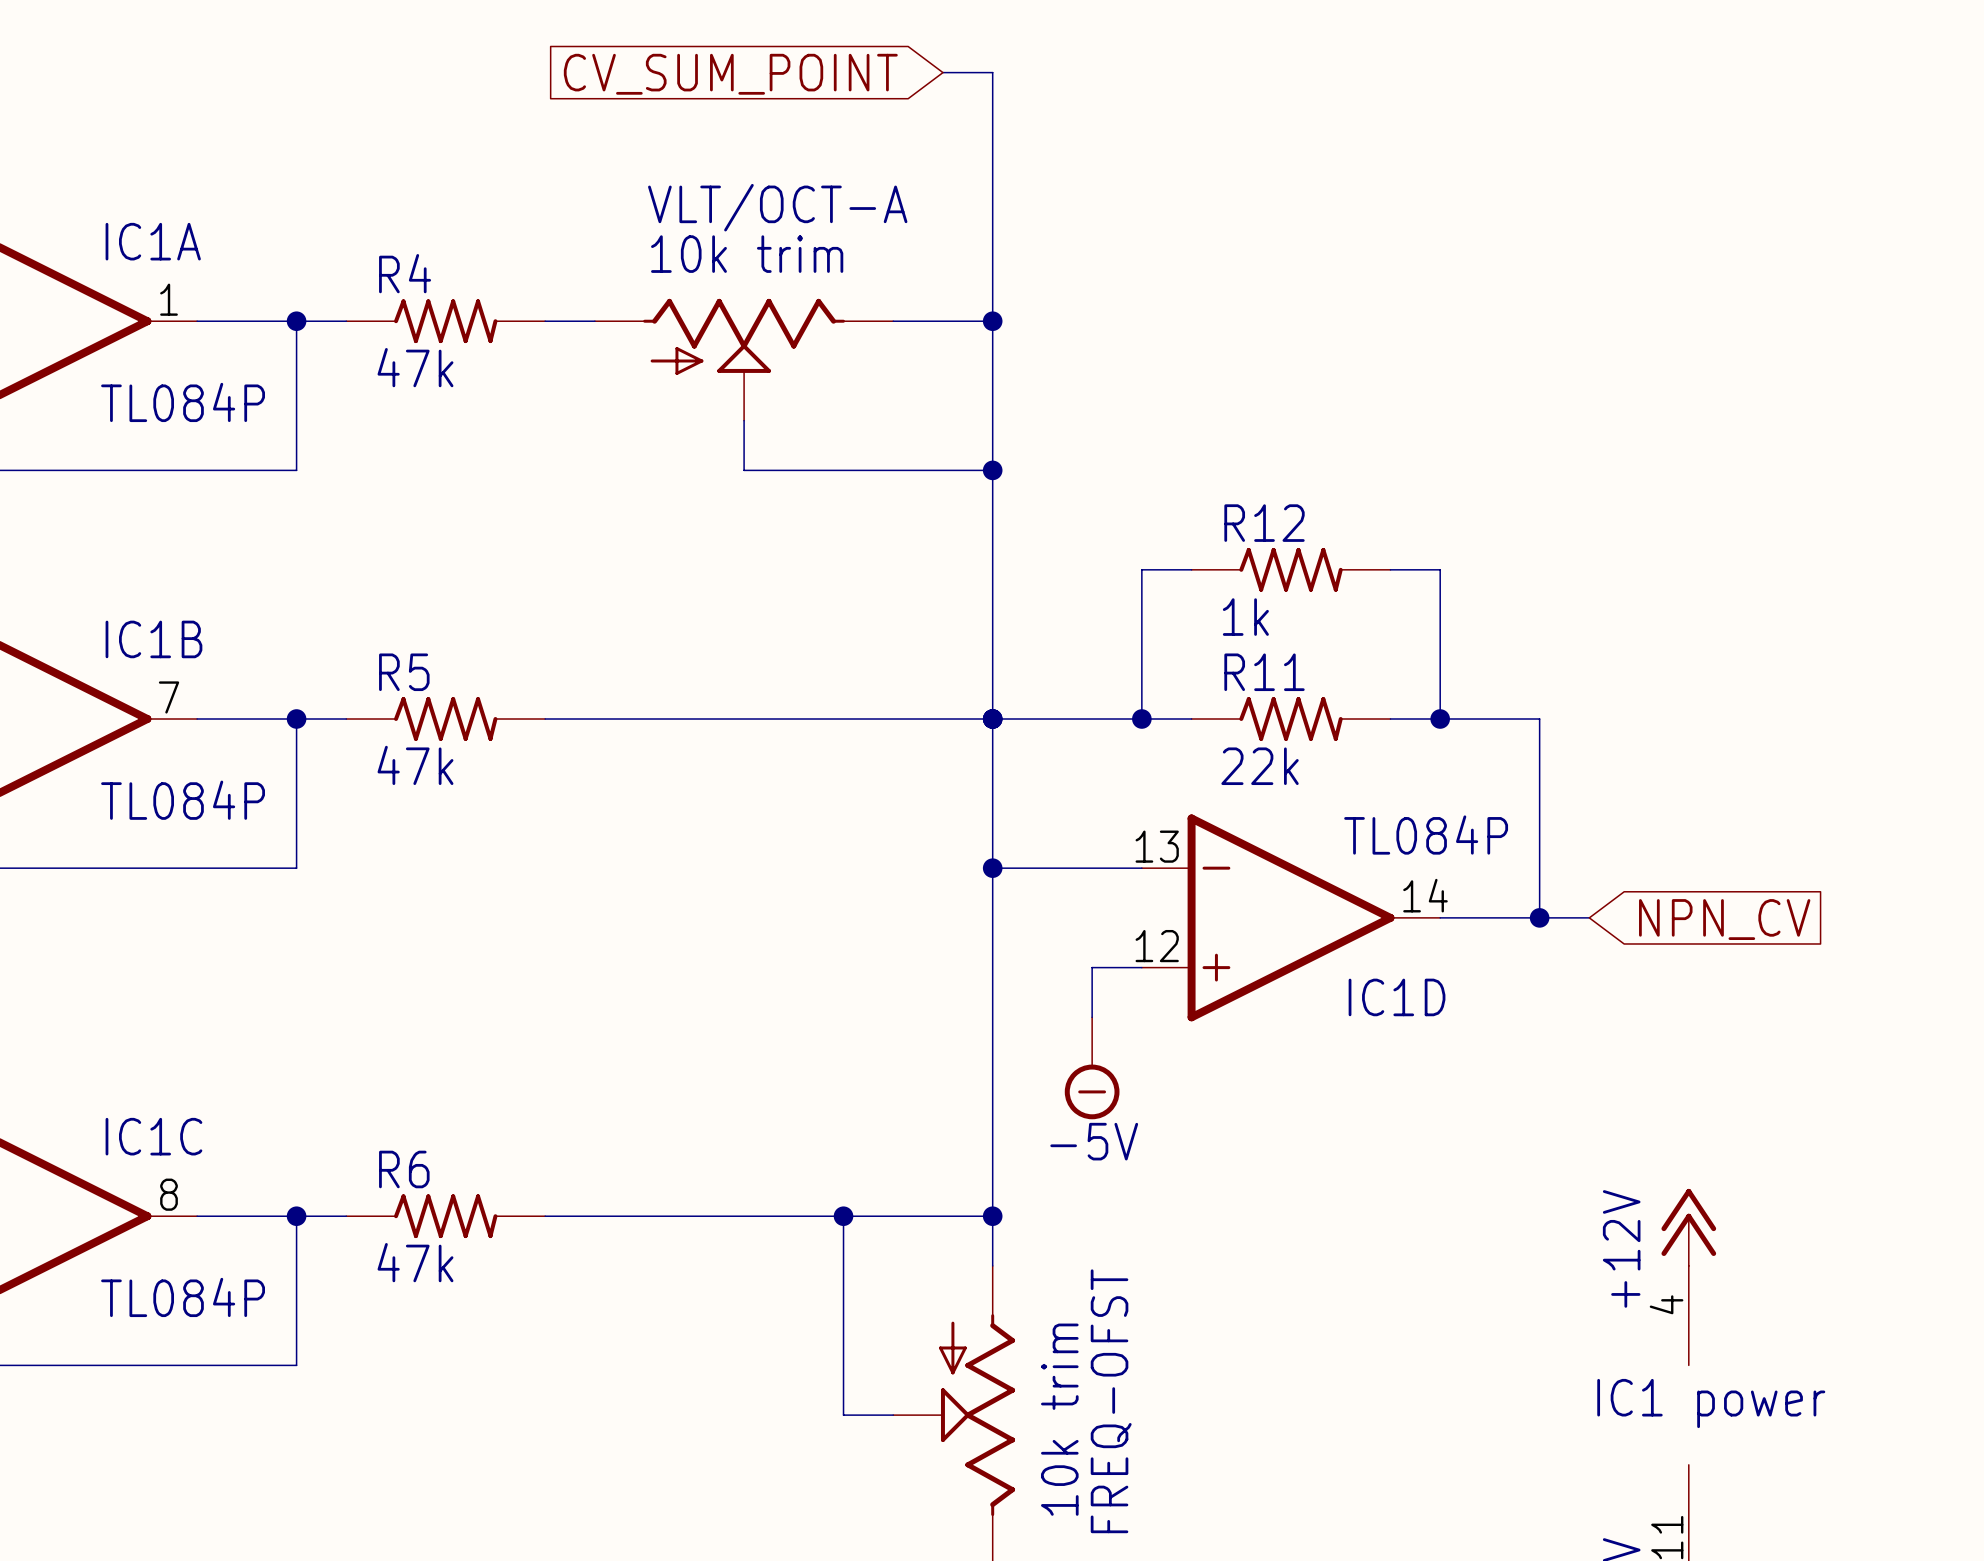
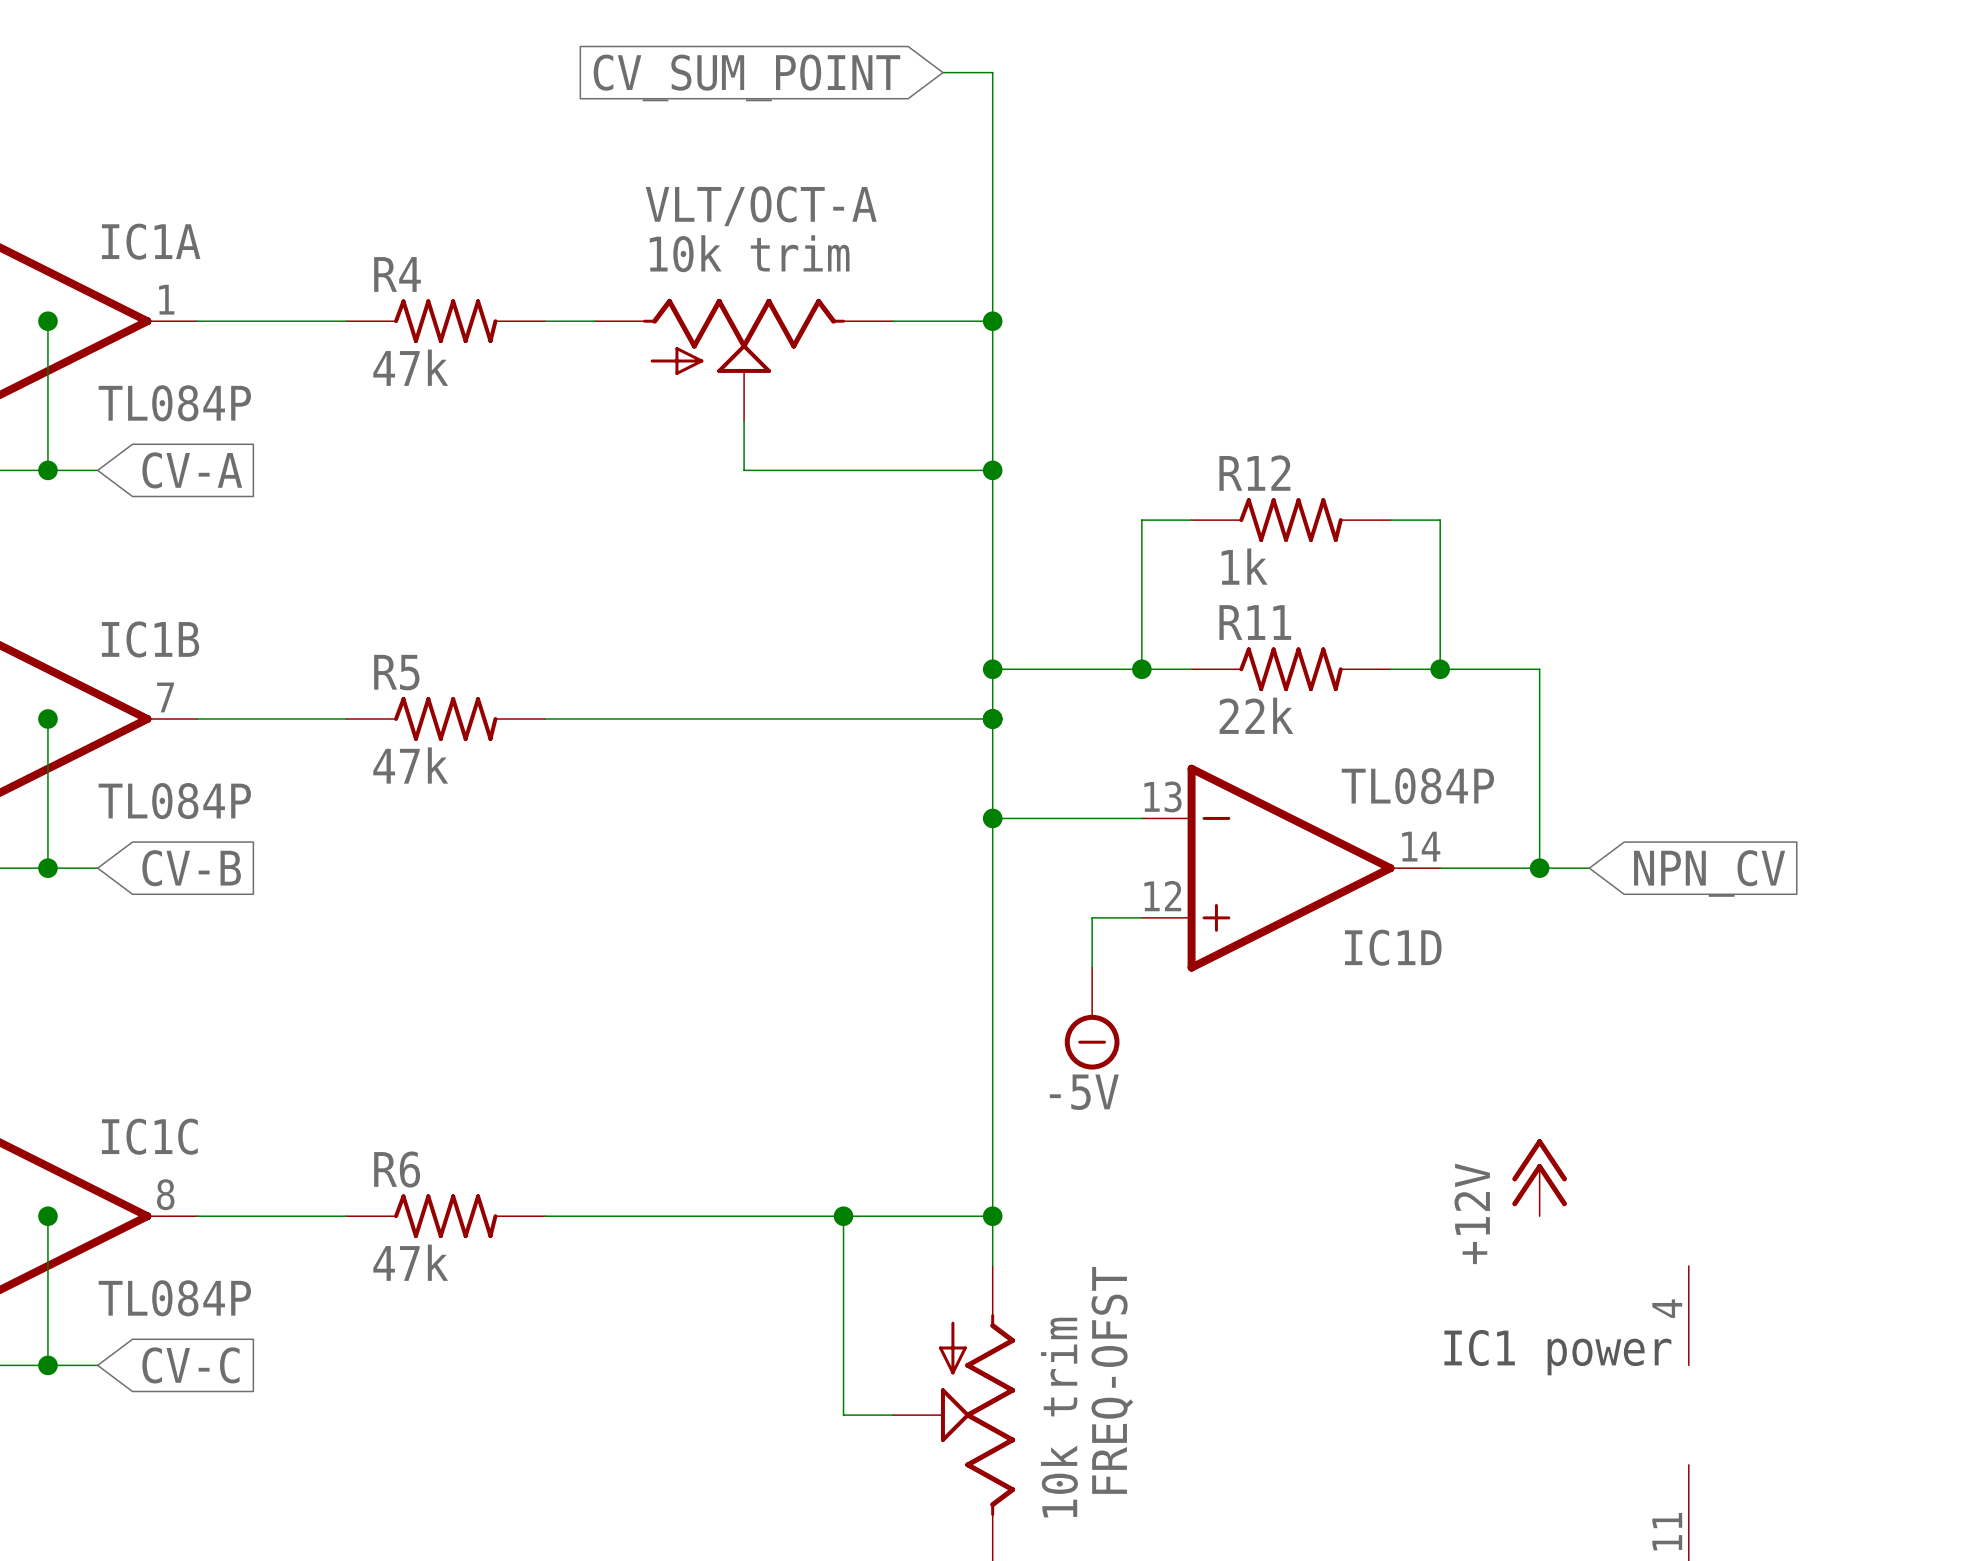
wire: none -> (47, 321) (47, 470)
junction: none -> (47, 321)
wire: (296, 321) (296, 470) (97, 470) -> none
junction: (296, 321) -> none
junction: none -> (47, 470)
global label: none -> CV-A (192, 470)
wire: (1141, 569) (1191, 569) -> (1141, 569) (1141, 520) (1191, 520)
R12 position: (1291, 569) -> (1291, 520)
wire: (1390, 569) (1440, 569) -> (1390, 520) (1440, 520) (1440, 569)
junction: none -> (992, 669)
wire: (1141, 669) (1141, 719) -> none
wire: (1440, 669) (1440, 719) -> none
wire: none -> (47, 719) (47, 868)
junction: none -> (47, 719)
wire: (296, 719) (296, 868) (97, 868) -> none
junction: (296, 719) -> none
wire: (992, 719) (1191, 719) -> (992, 669) (1191, 669)
junction position: (1141, 719) -> (1141, 669)
R11 position: (1291, 719) -> (1291, 669)
wire: (1390, 719) (1539, 719) -> (1390, 669) (1539, 669) (1539, 719)
junction position: (1440, 719) -> (1440, 669)
junction: none -> (47, 868)
global label: none -> CV-B (191, 868)
wire: (992, 868) (1141, 868) -> (992, 818) (1141, 818)
junction position: (992, 868) -> (992, 818)
wire: (1539, 868) (1539, 917) -> none
IC1D position: (1291, 917) -> (1291, 868)
wire: (1440, 917) (1589, 917) -> (1440, 868) (1589, 868)
junction position: (1539, 917) -> (1539, 868)
global label position: NPN_CV (1724, 919) -> NPN_CV (1709, 873)
wire: (1141, 967) (1092, 967) (1092, 1017) -> (1141, 917) (1092, 917) (1092, 967)
power symbol position: -5V (1092, 1068) -> -5V (1092, 1018)
wire: none -> (47, 1216) (47, 1365)
junction: none -> (47, 1216)
wire: (296, 1216) (296, 1365) (97, 1365) -> none
junction: (296, 1216) -> none
power symbol position: +12V (1688, 1227) -> +12V (1539, 1177)
junction: none -> (47, 1365)
global label: none -> CV-C (190, 1365)
text position: IC1 power (1711, 1403) -> IC1 power (1557, 1352)

